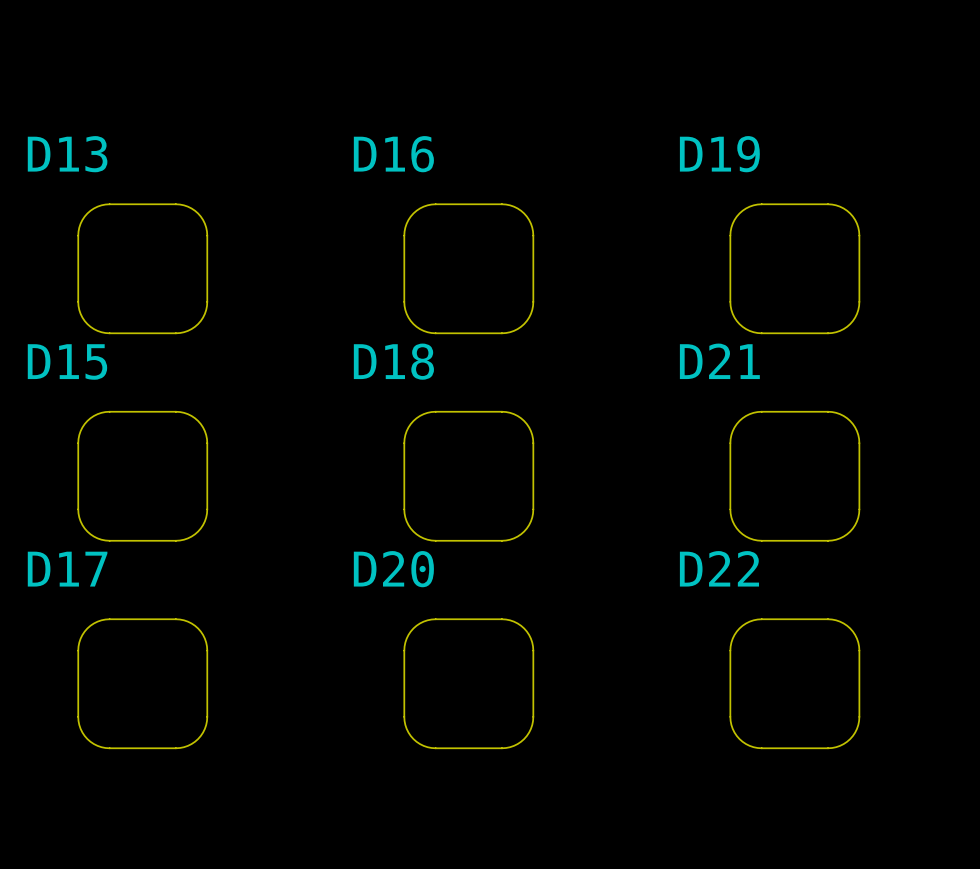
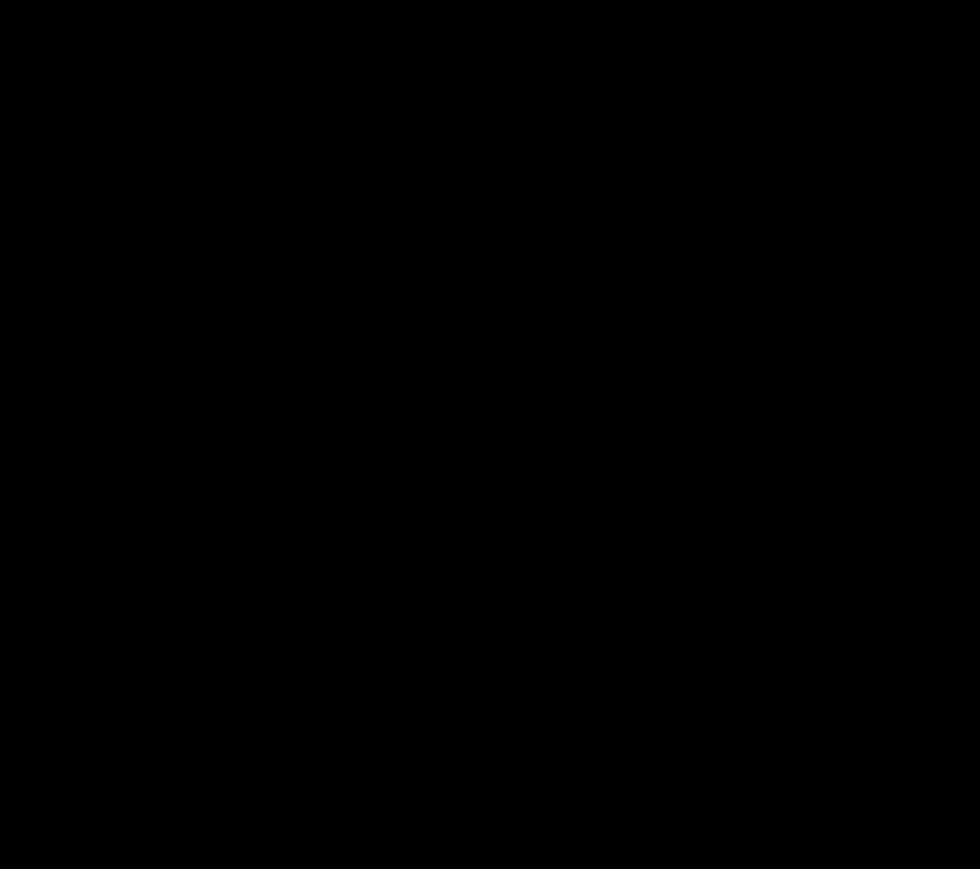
D13: (142, 268) -> none
D16: (468, 268) -> none
D19: (794, 268) -> none
D15: (142, 476) -> none
D18: (468, 476) -> none
D21: (794, 476) -> none
D17: (142, 683) -> none
D20: (468, 683) -> none
D22: (794, 683) -> none

